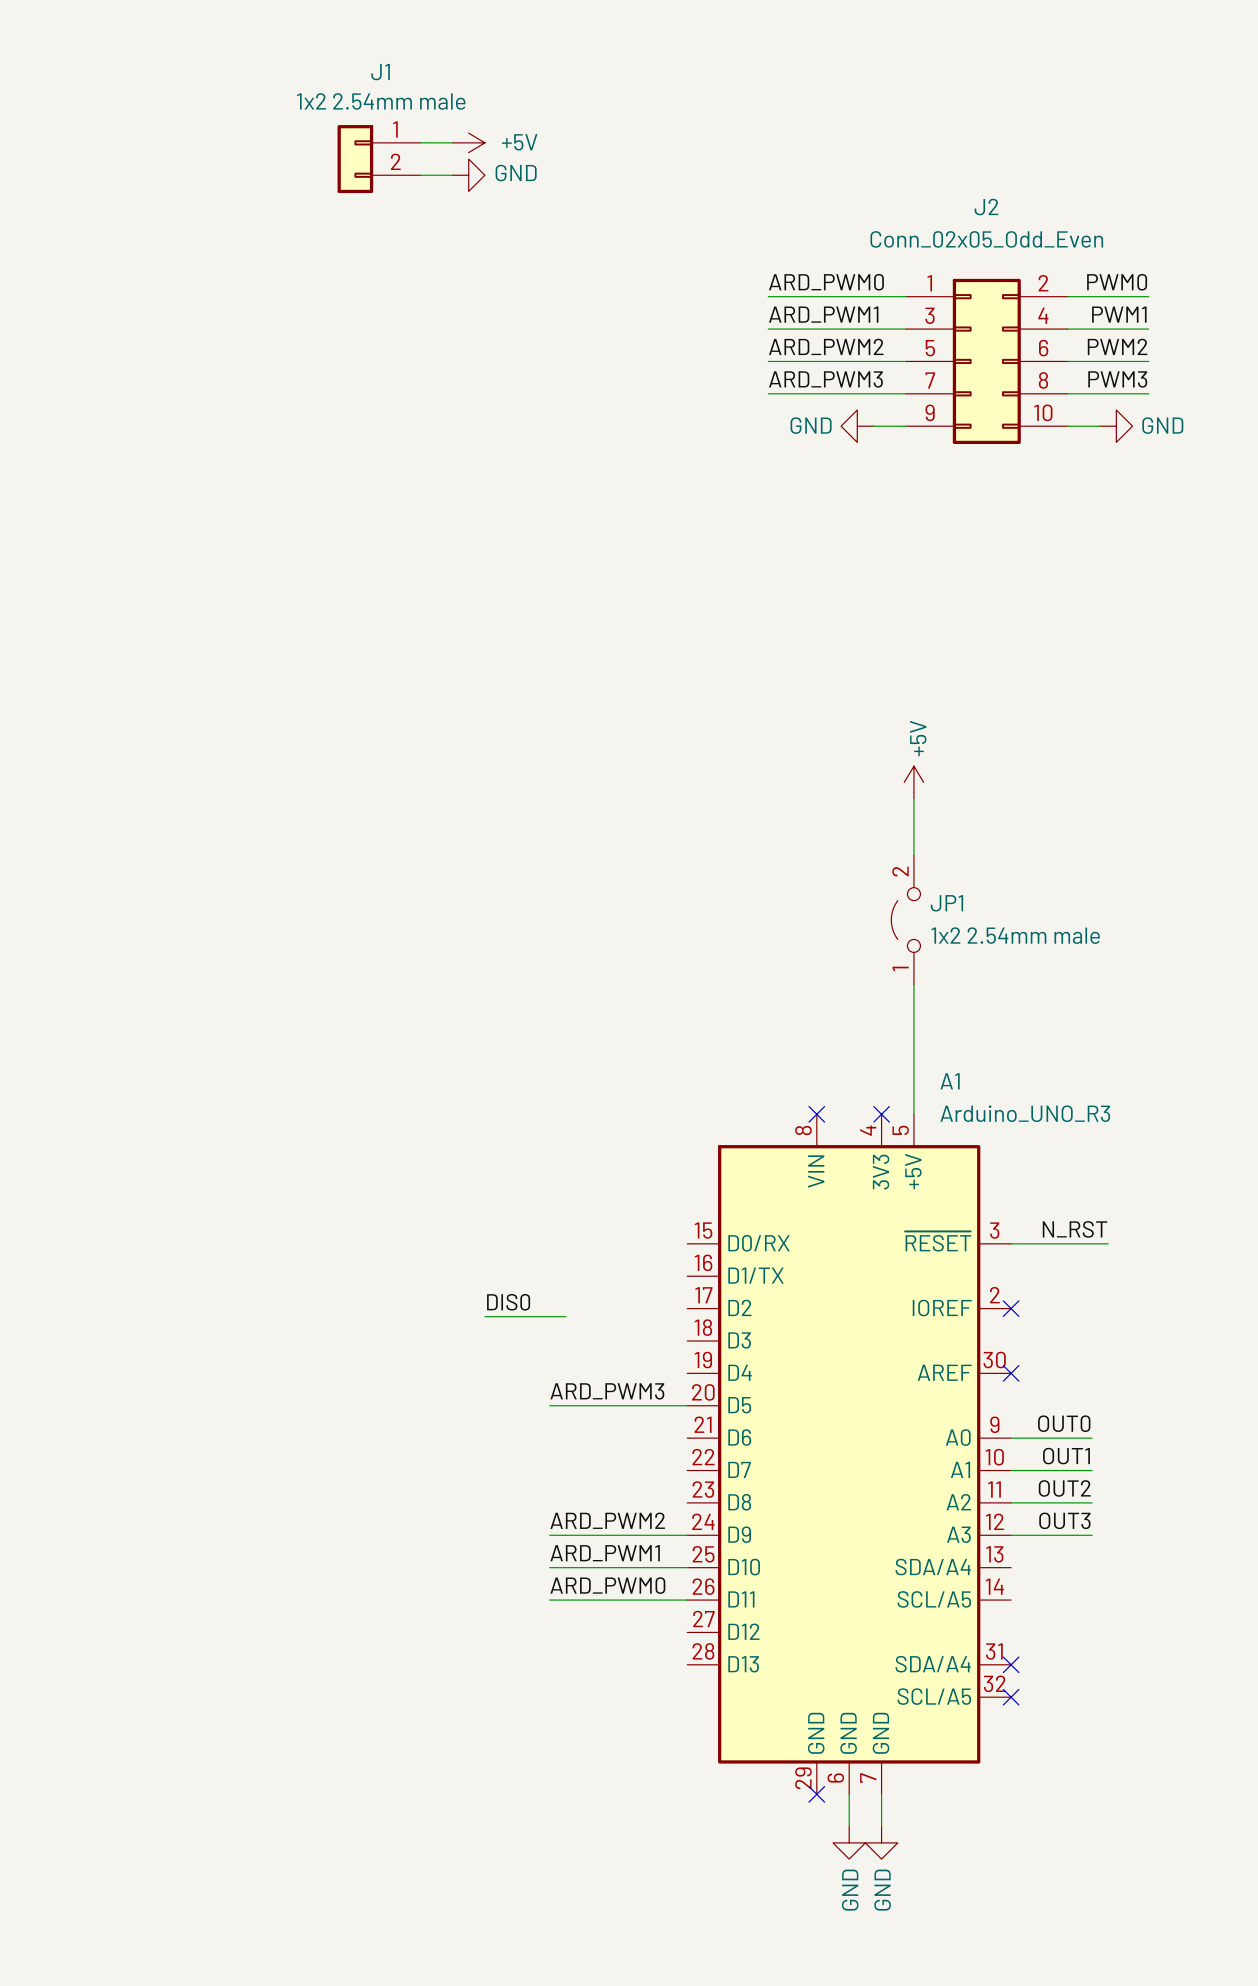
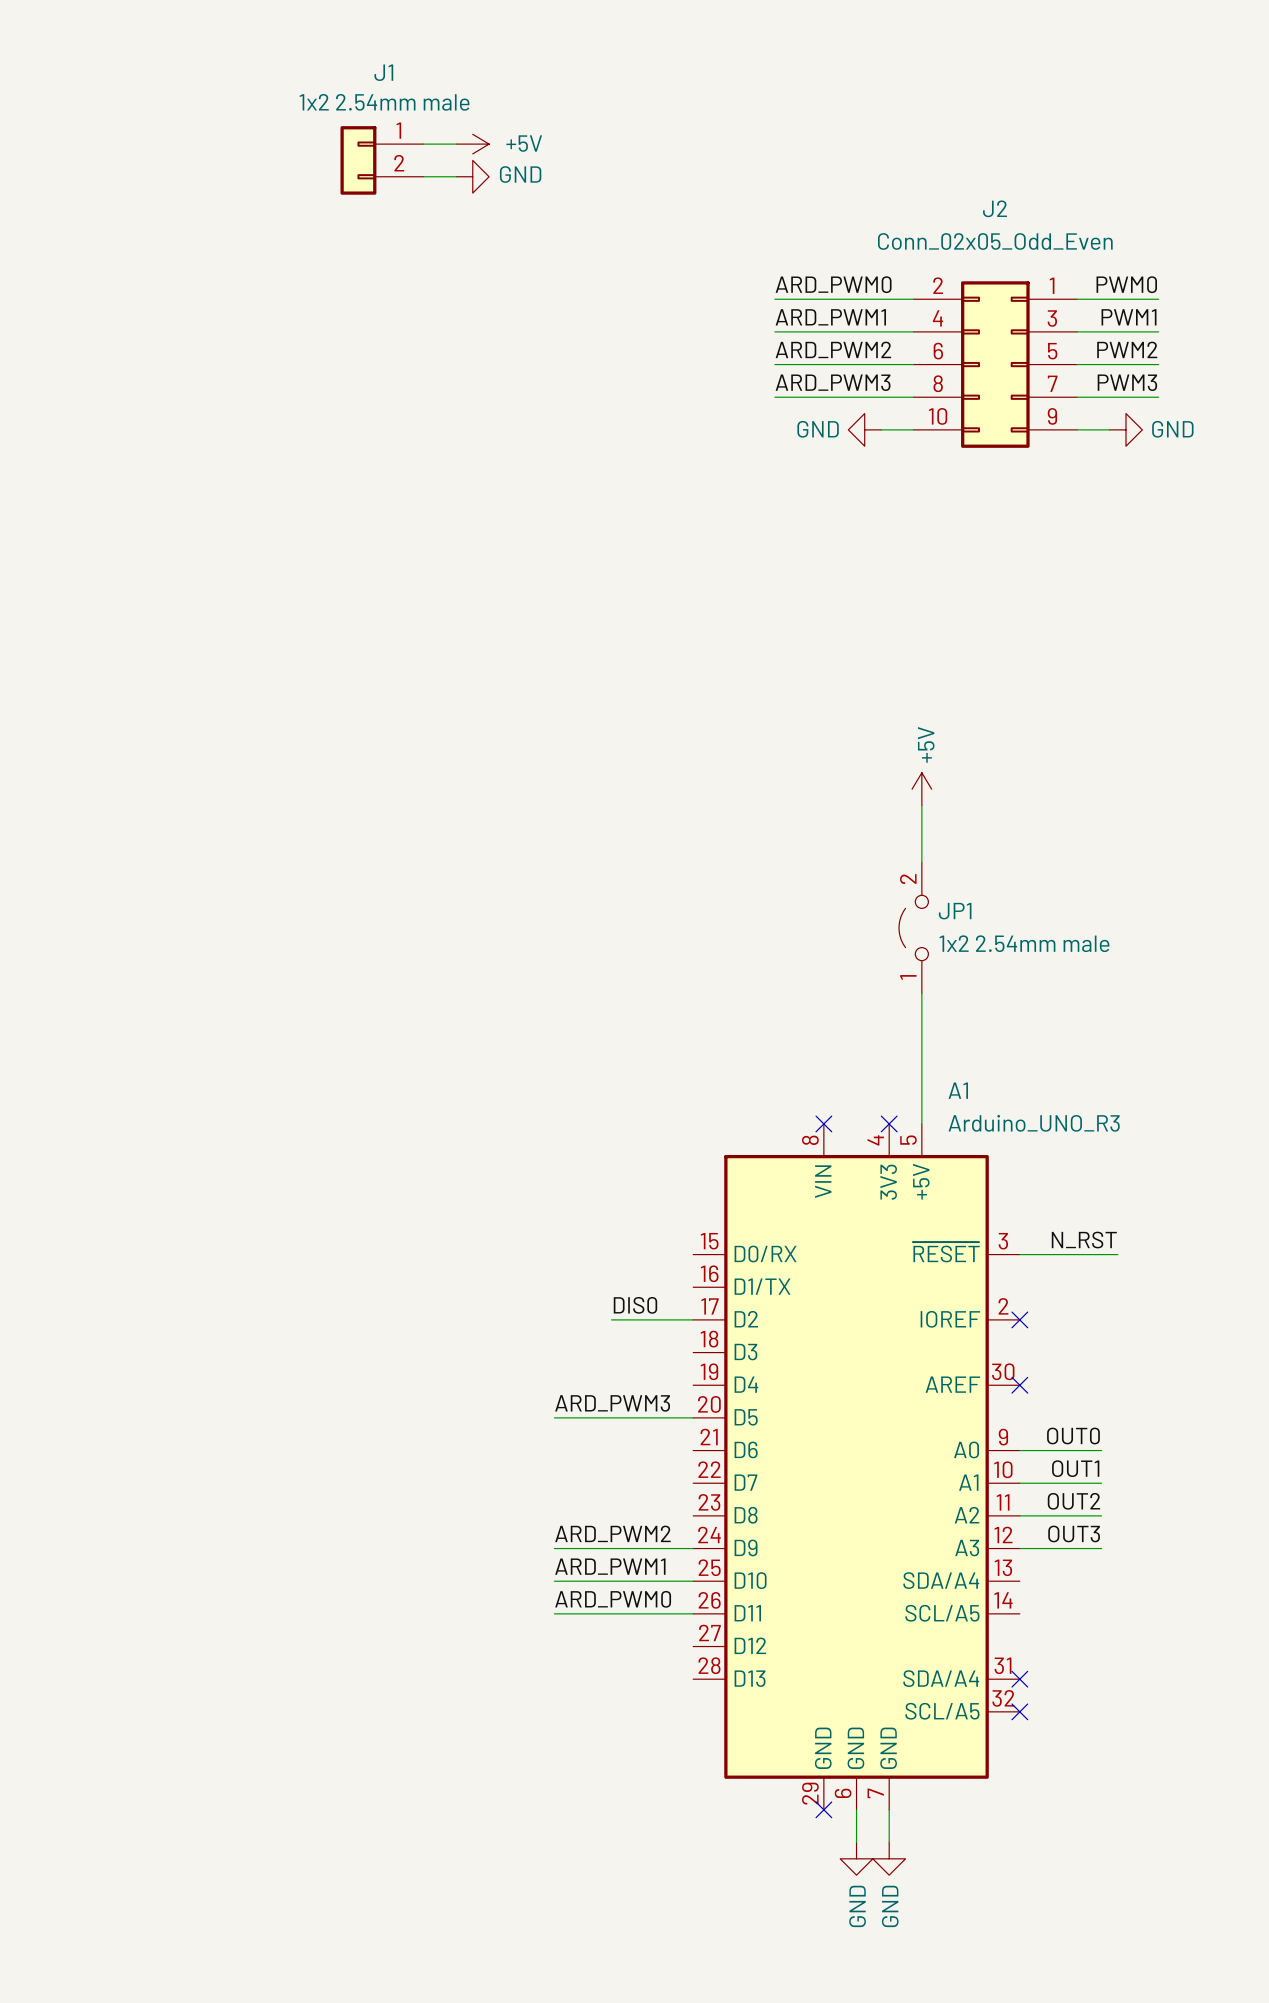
J2 flip: as is (986, 361) -> left-right (995, 364)
label position: DIS0 (508, 1302) -> DIS0 (635, 1305)
wire: (484, 1316) (565, 1316) -> (611, 1319) (693, 1319)

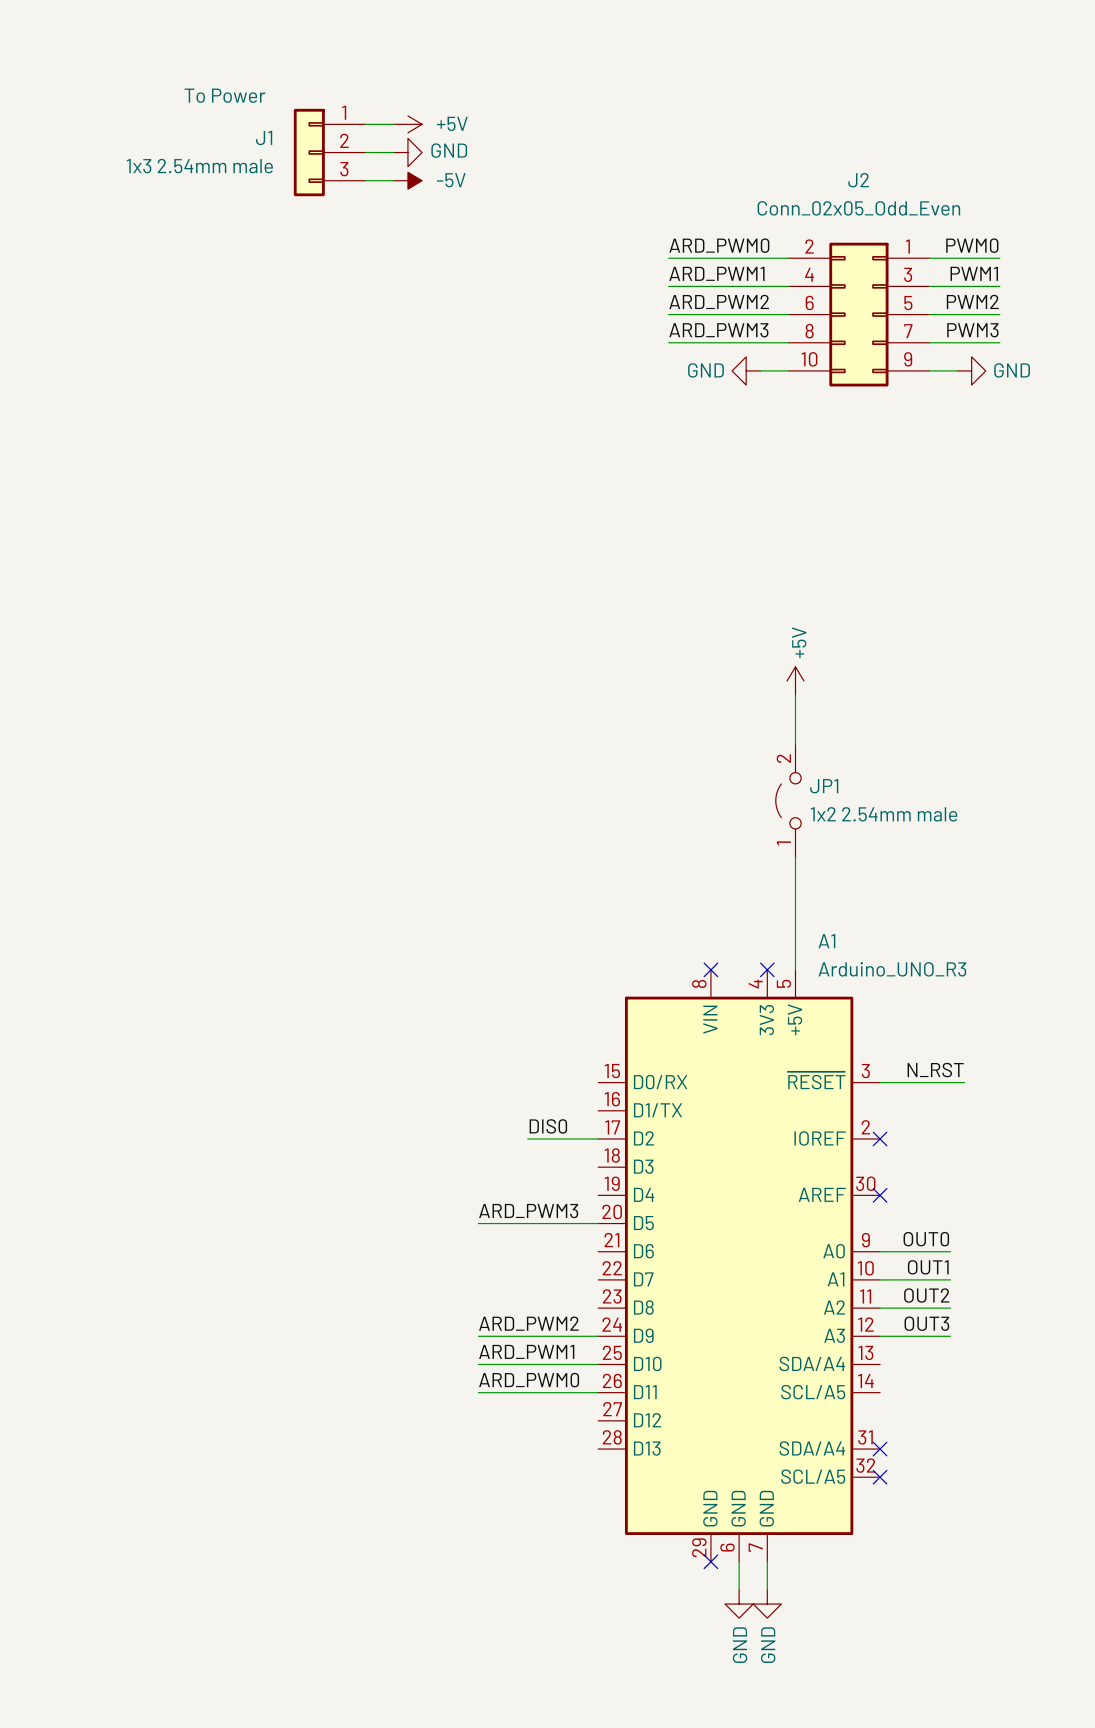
J1 name position: J1 (383, 72) -> J1 (264, 137)
J1 value: 1x2 2.54mm male (384, 102) -> 1x3 2.54mm male (199, 166)
J1 text: none -> To Power (225, 95)
J1 symbol: [340, 126, 424, 195] -> [293, 108, 366, 197]
wire: none -> (365, 180) (393, 180)
power symbol: none -> -5V (407, 180)

